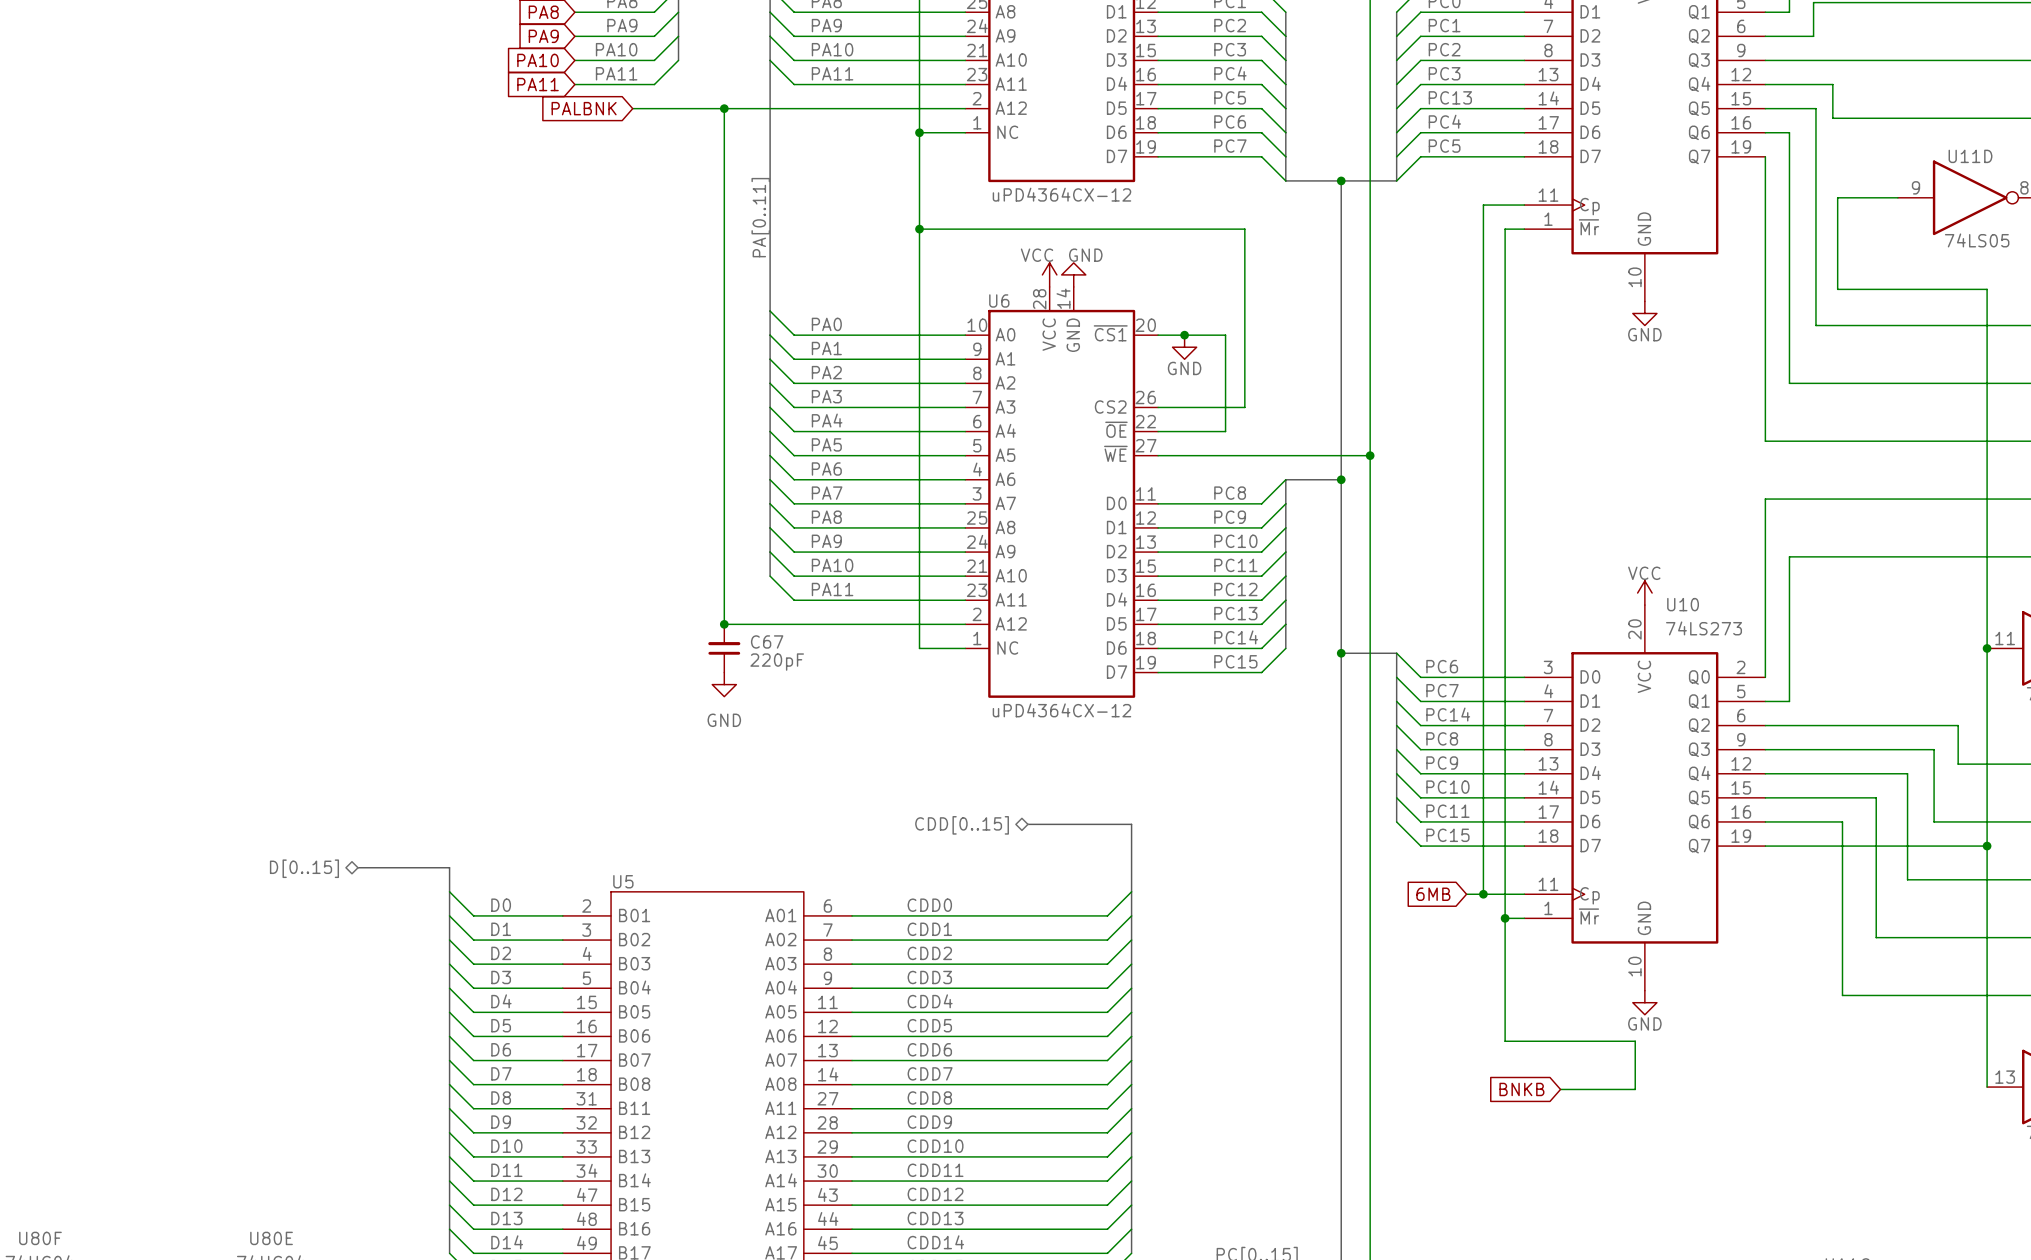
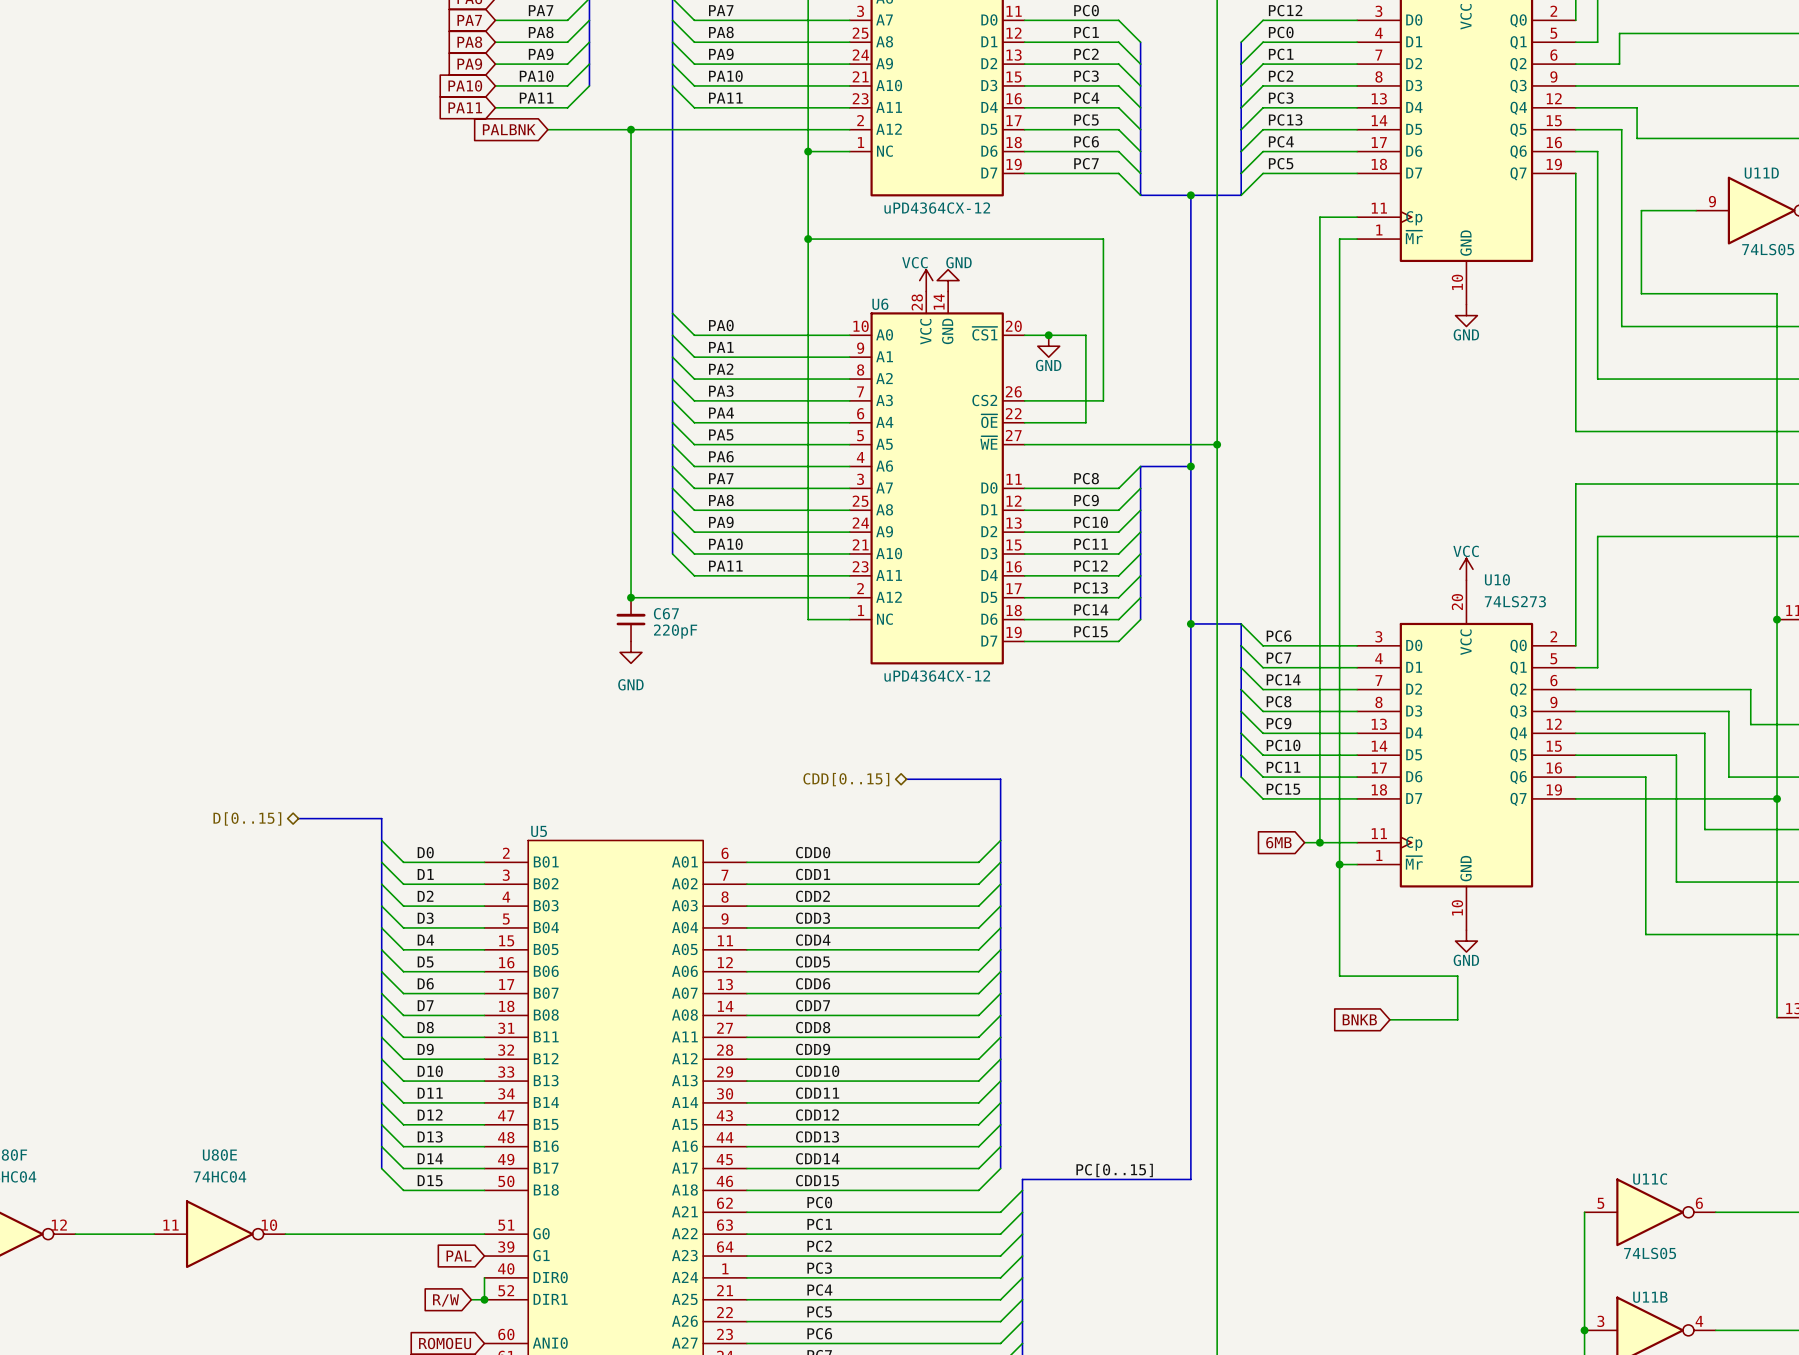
label: PA[0..11] (760, 217) -> none

